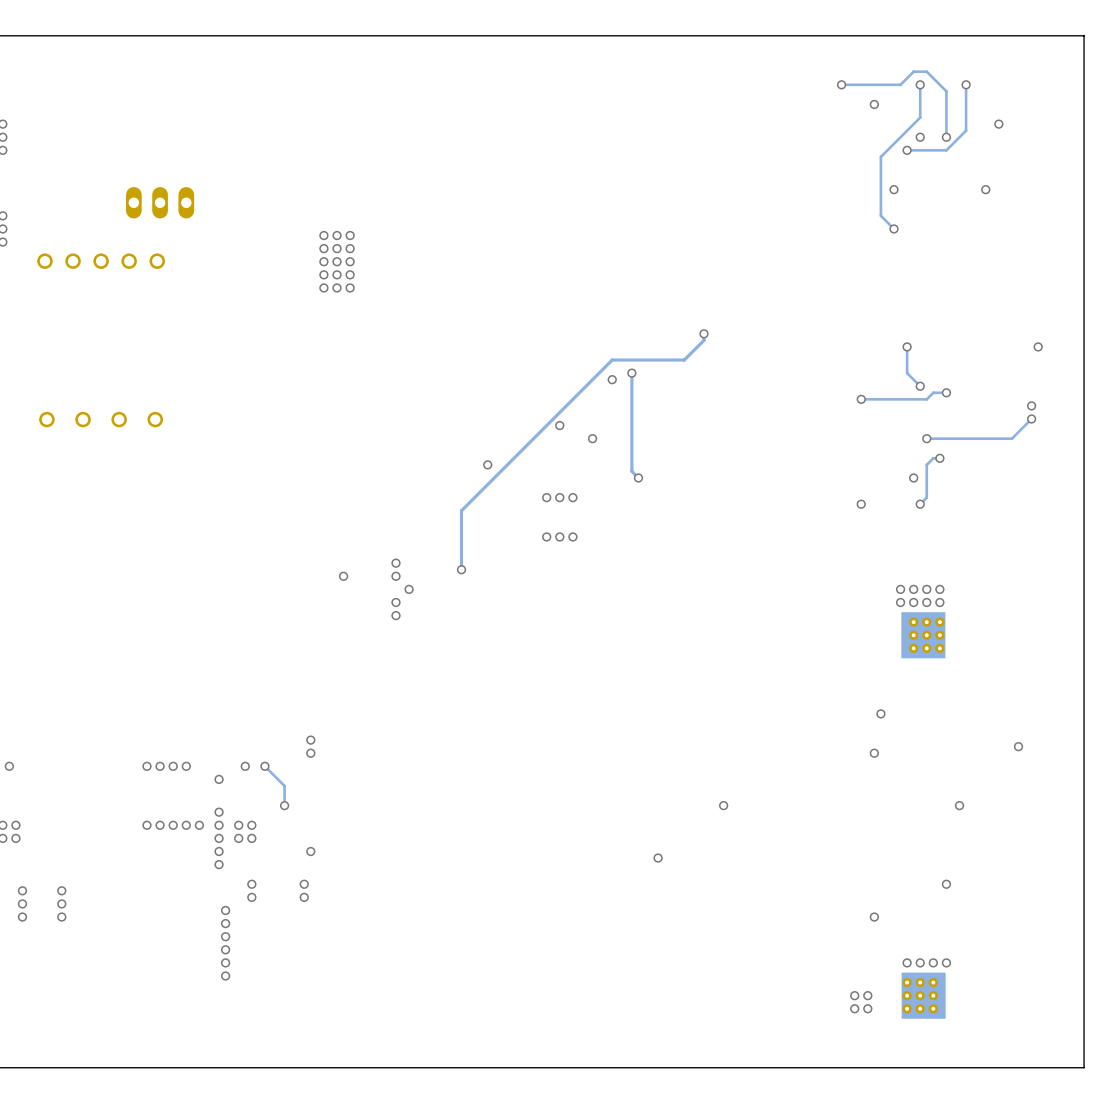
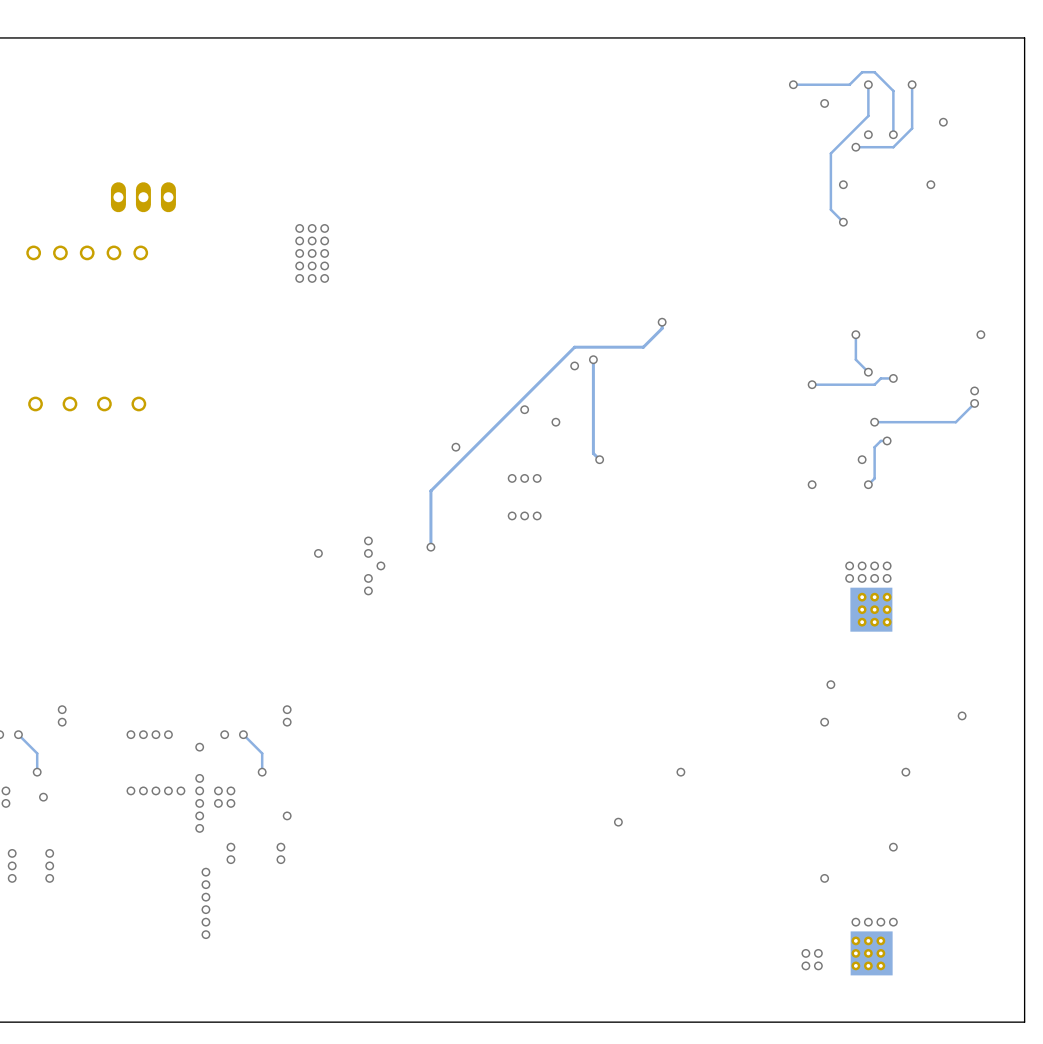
via: none -> (62, 709)
via: none -> (62, 722)
track: none -> (18, 734) (37, 753) (37, 772)
via: none -> (18, 734)
via: none -> (37, 772)
via: none -> (43, 797)

